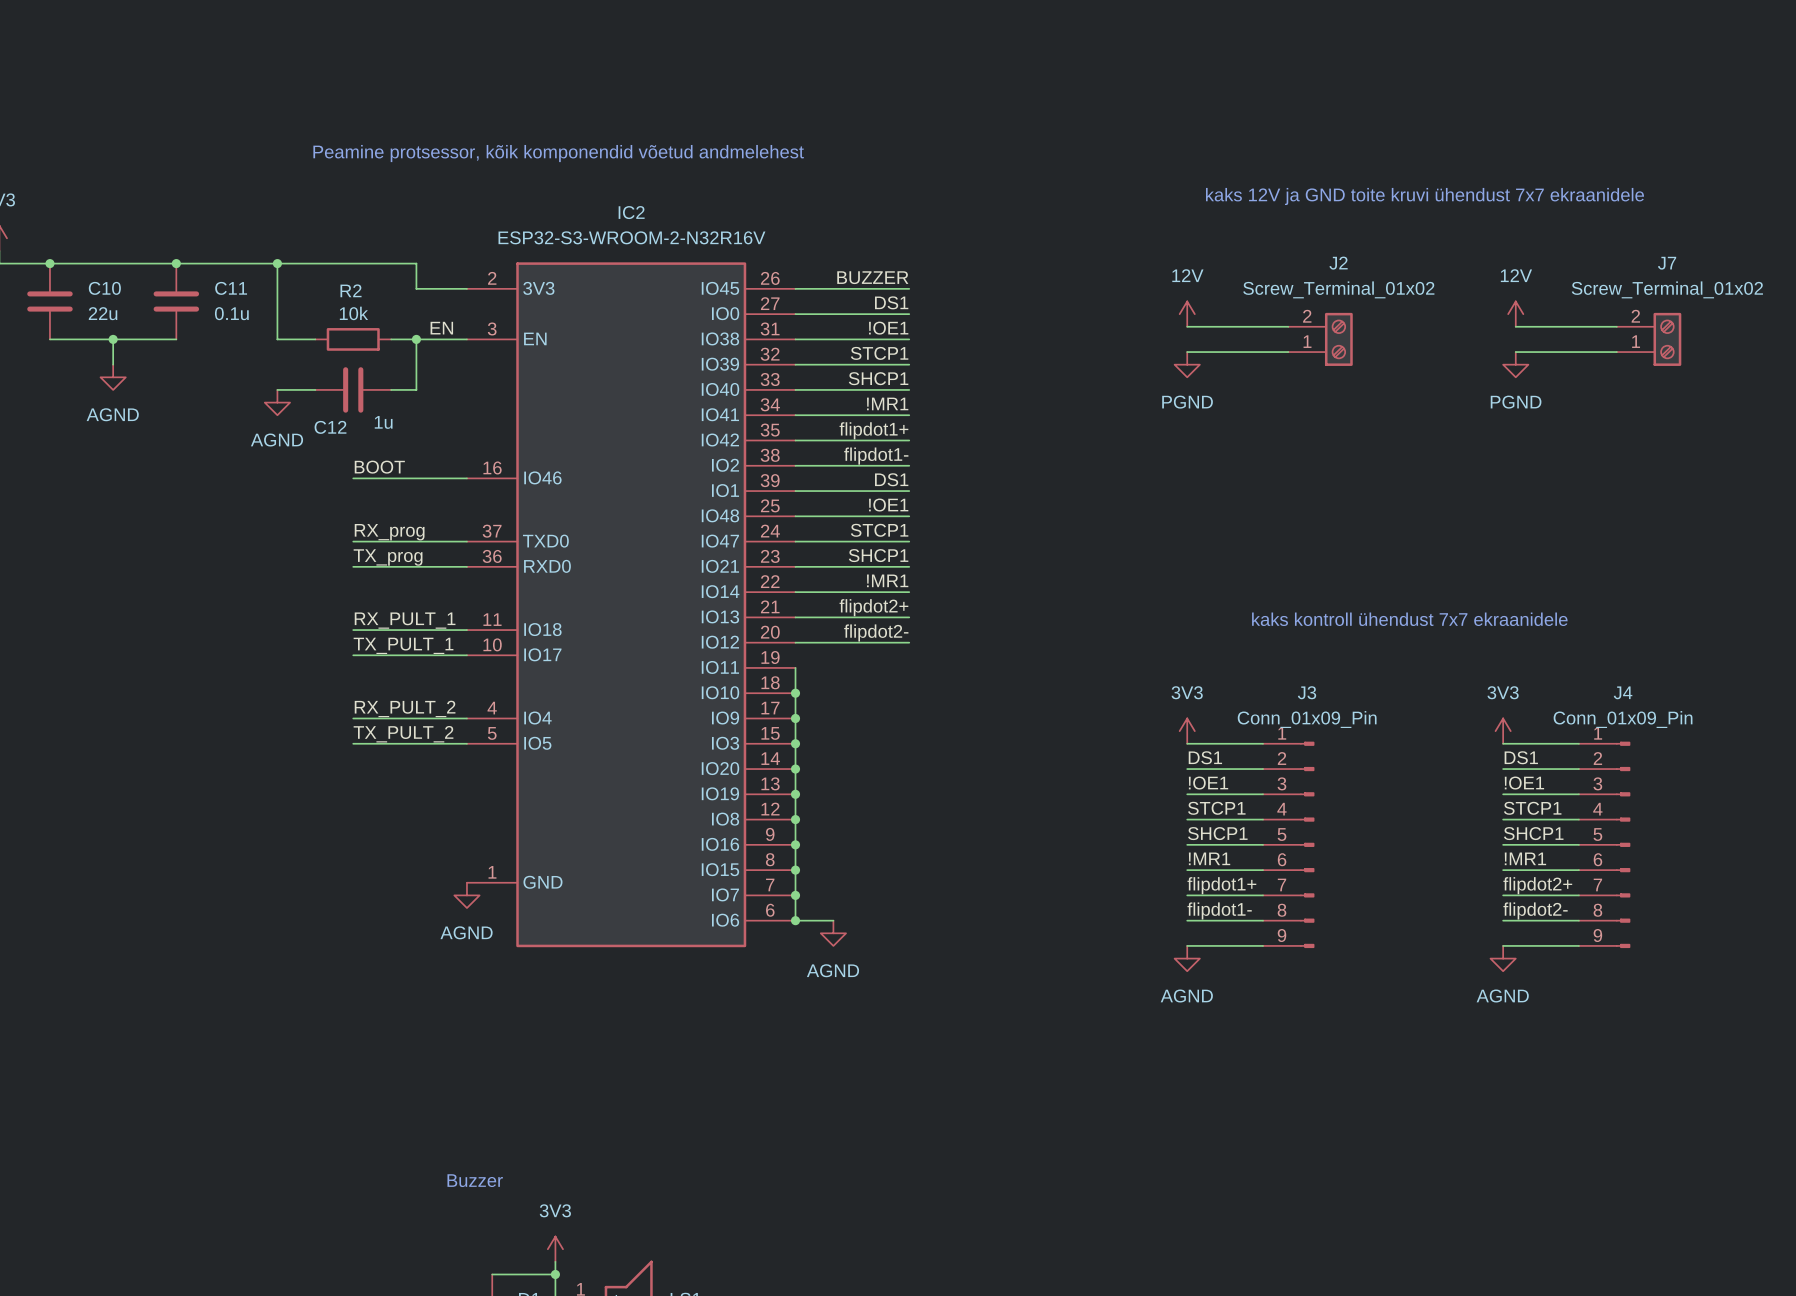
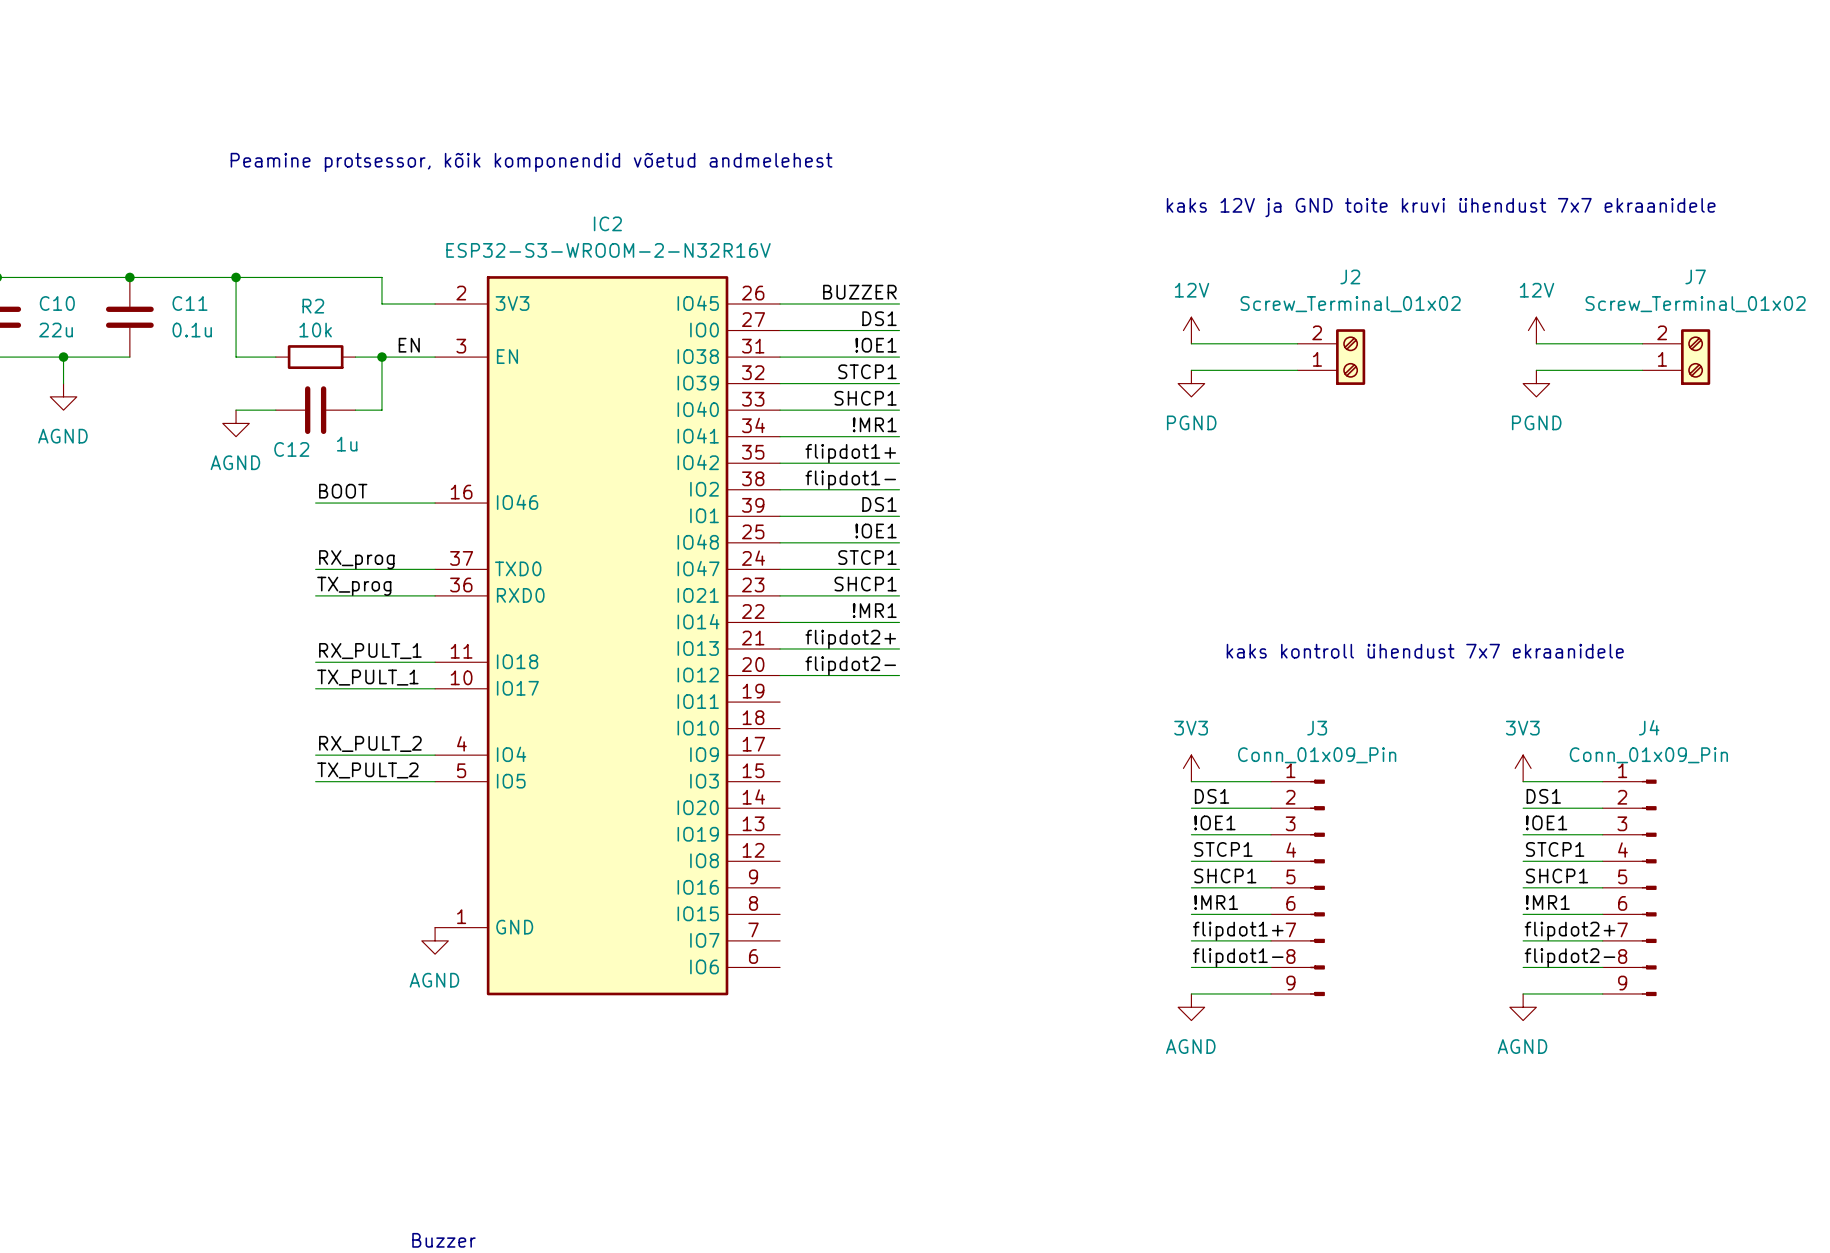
wire: (795, 667) (795, 920) (833, 920) -> none
junction: (795, 693) -> none
junction: (795, 718) -> none
junction: (795, 743) -> none
junction: (795, 769) -> none
junction: (795, 794) -> none
junction: (795, 819) -> none
junction: (795, 844) -> none
junction: (795, 870) -> none
junction: (795, 895) -> none
junction: (795, 920) -> none
power symbol: AGND (833, 933) -> none

